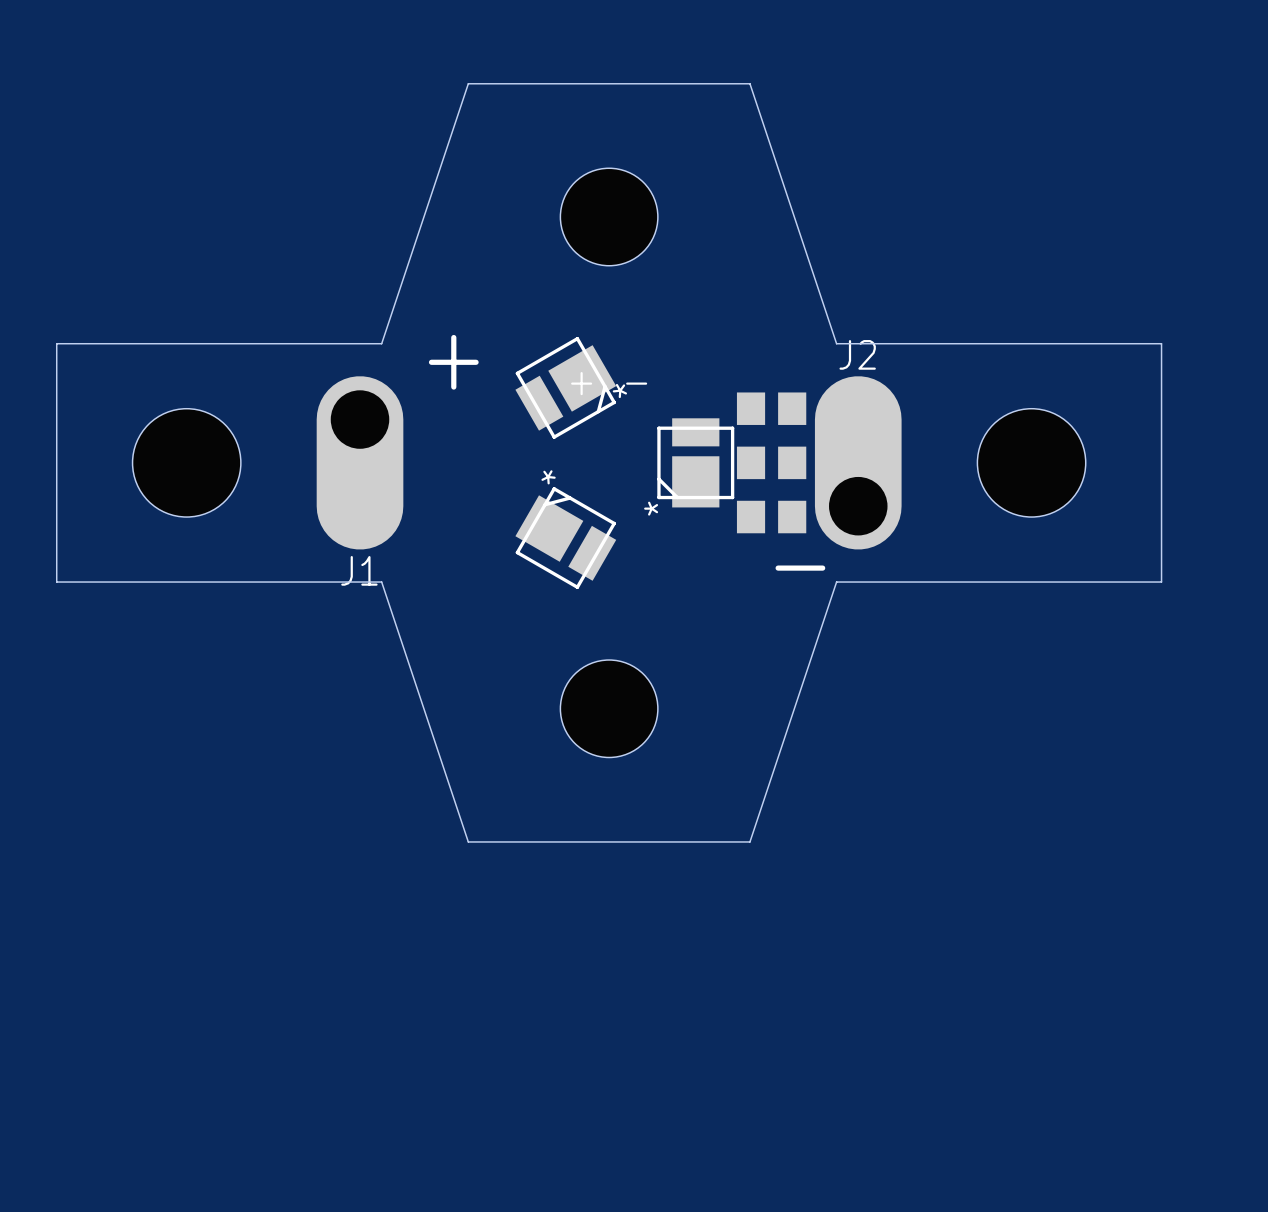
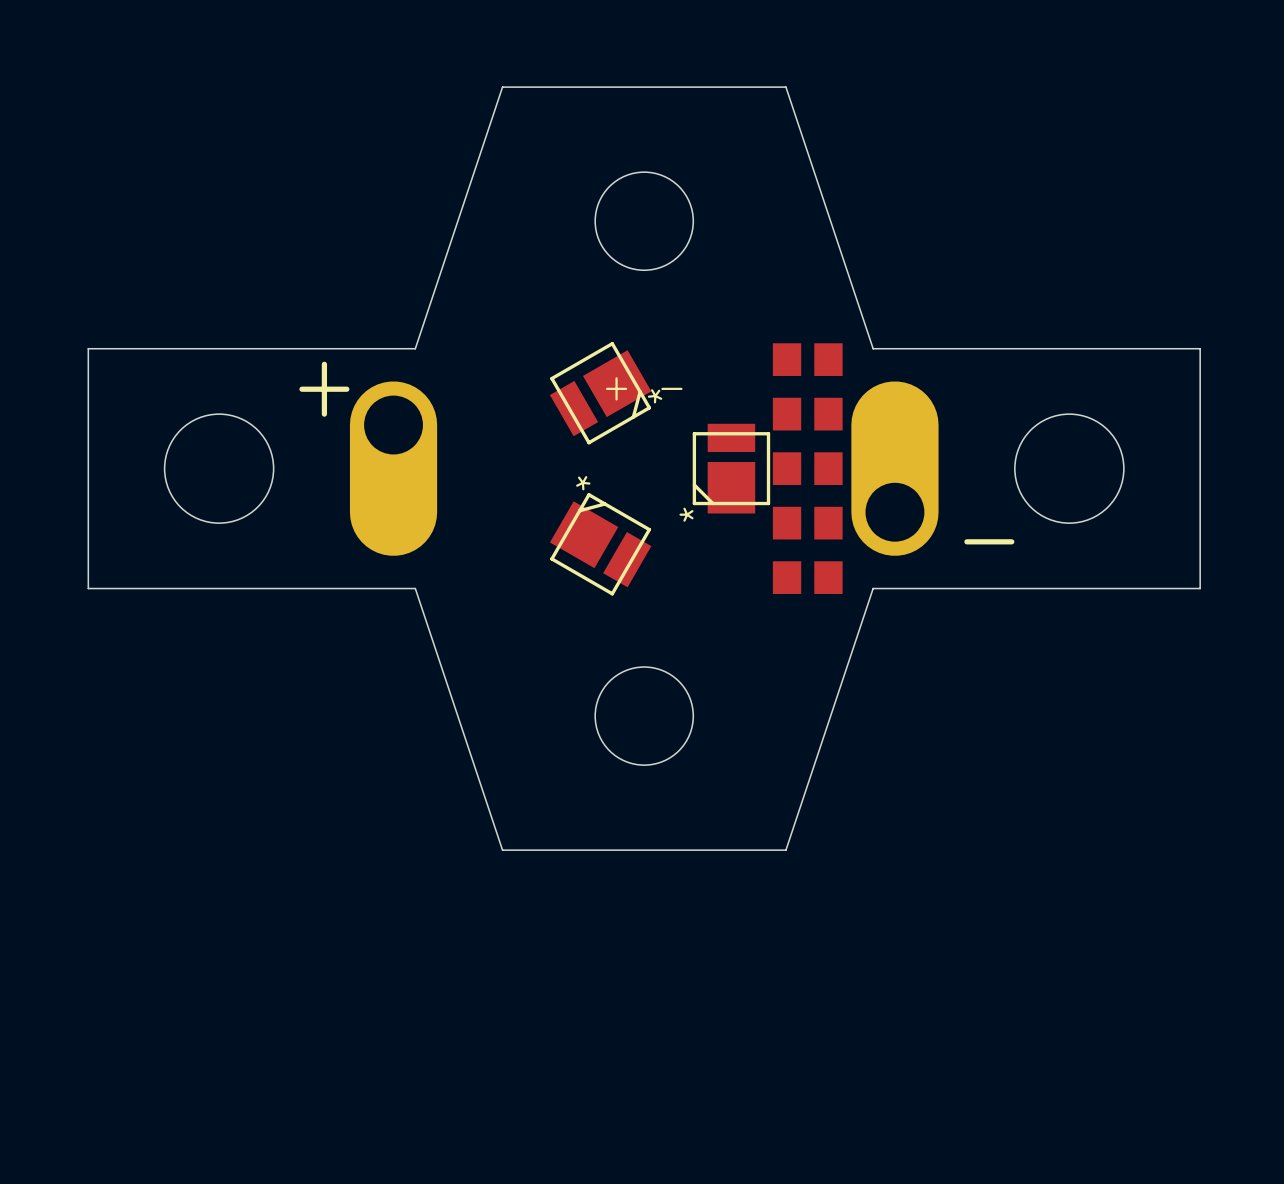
part: none -> (807, 359)
J2 name: J2 (857, 354) -> none
text position: + (453, 362) -> + (324, 389)
text position: - (800, 568) -> - (989, 541)
J1 name: J1 (359, 570) -> none
part: none -> (807, 577)

